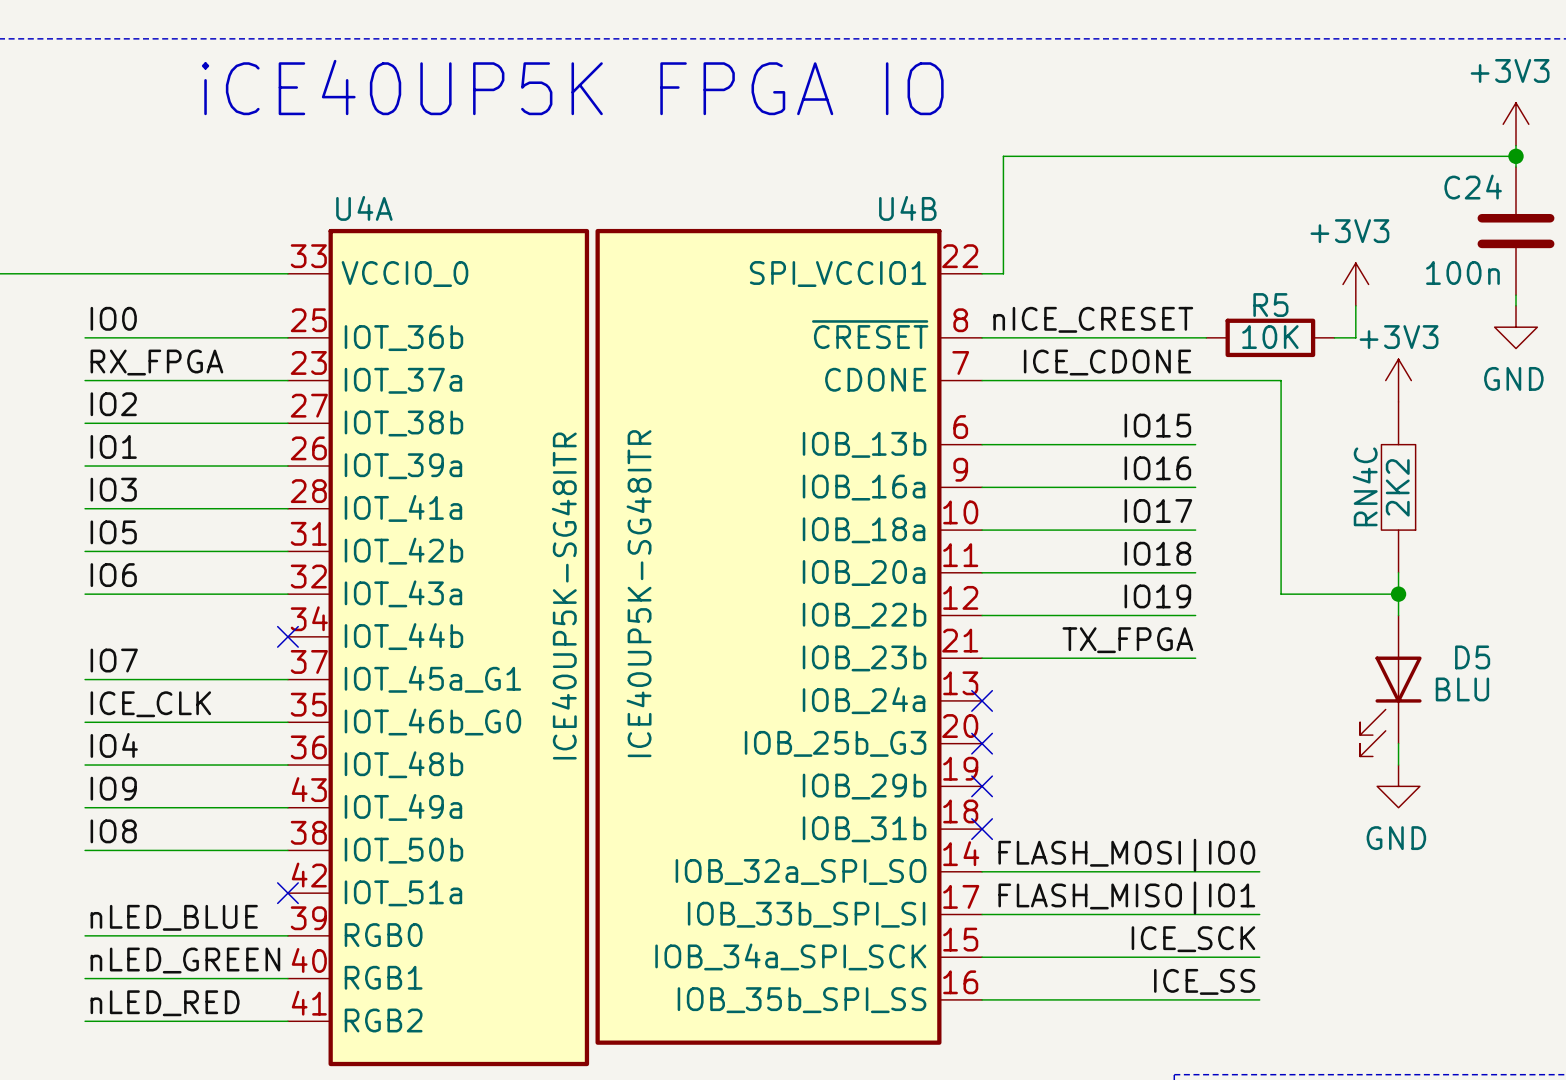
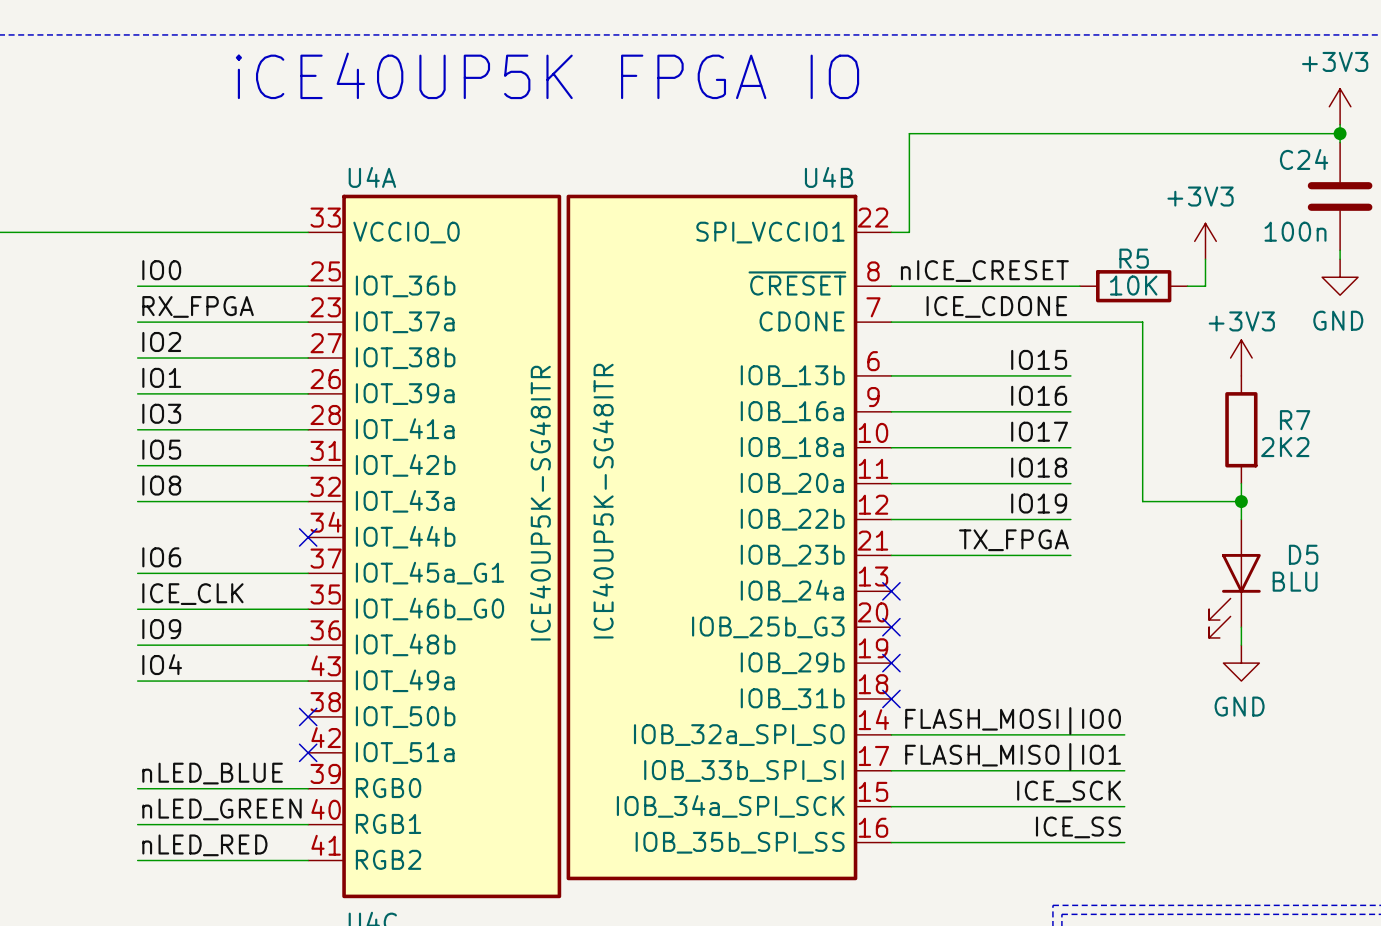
power symbol position: +3V3 (1398, 380) -> +3V3 (1241, 358)
RN4C: 2K2 (1398, 487) -> none
R7: none -> 2K2 (1241, 429)
label: IO6 (113, 575) -> IO8 (161, 485)
label: IO7 (114, 660) -> IO6 (161, 557)
label: IO4 (114, 745) -> IO9 (161, 629)
label: IO9 (113, 788) -> IO4 (162, 664)
label: IO8 (113, 831) -> none
wire: (85, 850) (287, 850) -> none
no-connect mark: none -> (308, 716)

